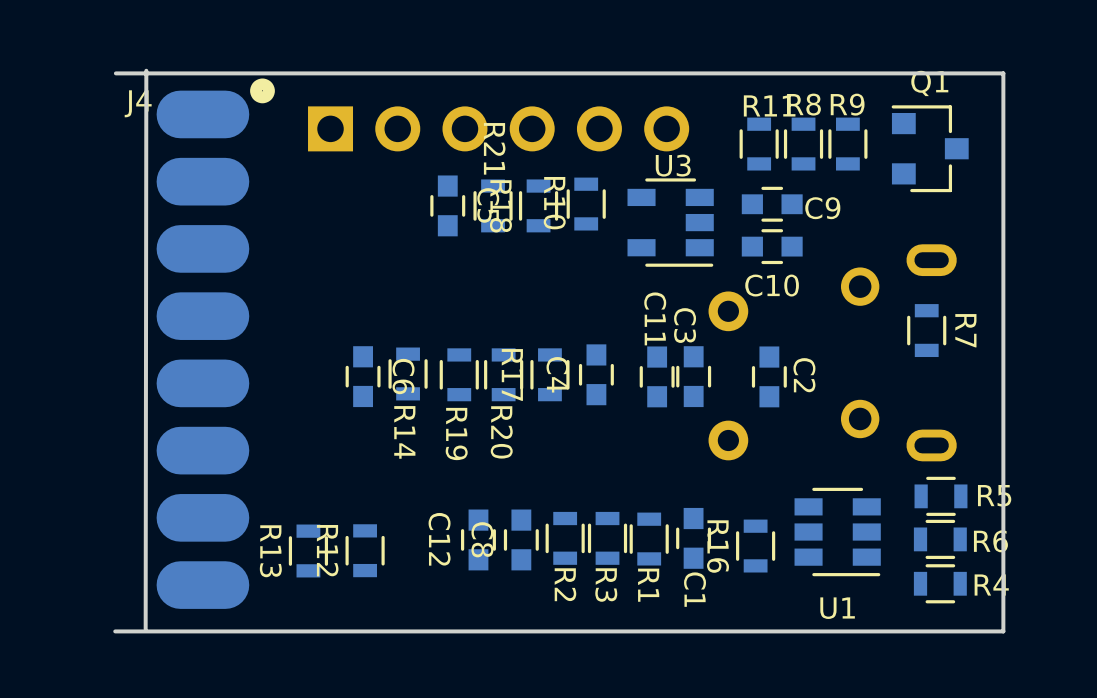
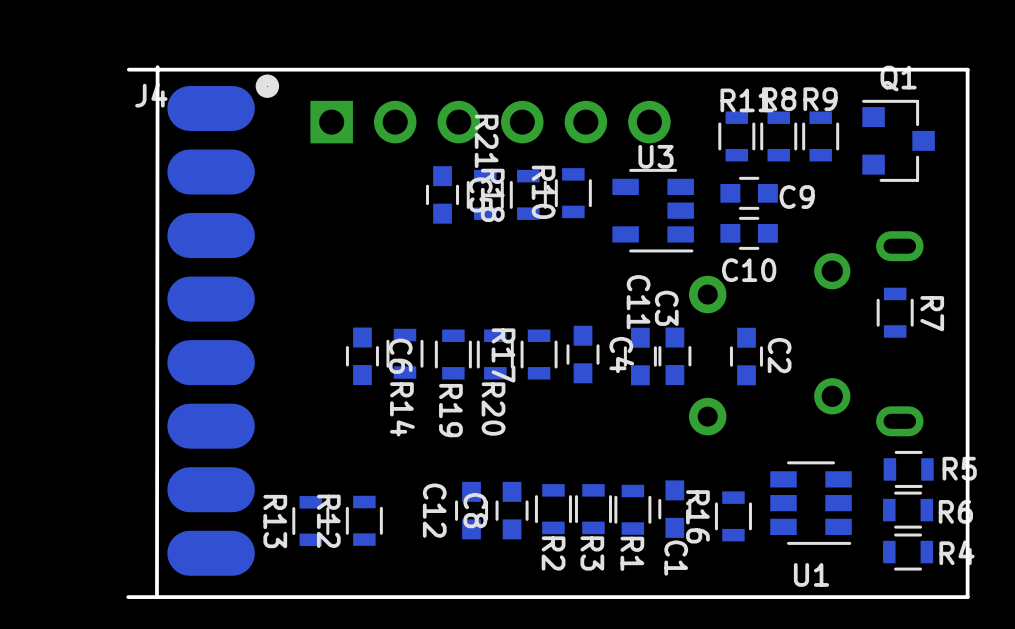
C4 name position: C4 (557, 374) -> C4 (621, 355)

